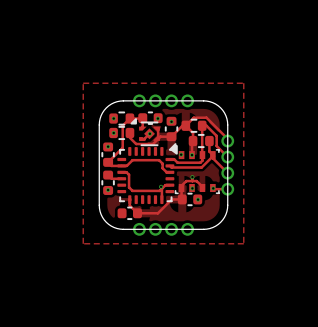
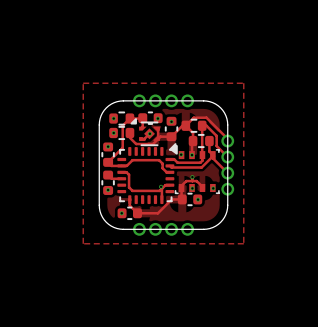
track: (213, 188) (227, 189) -> none
via: none -> (121, 213)

